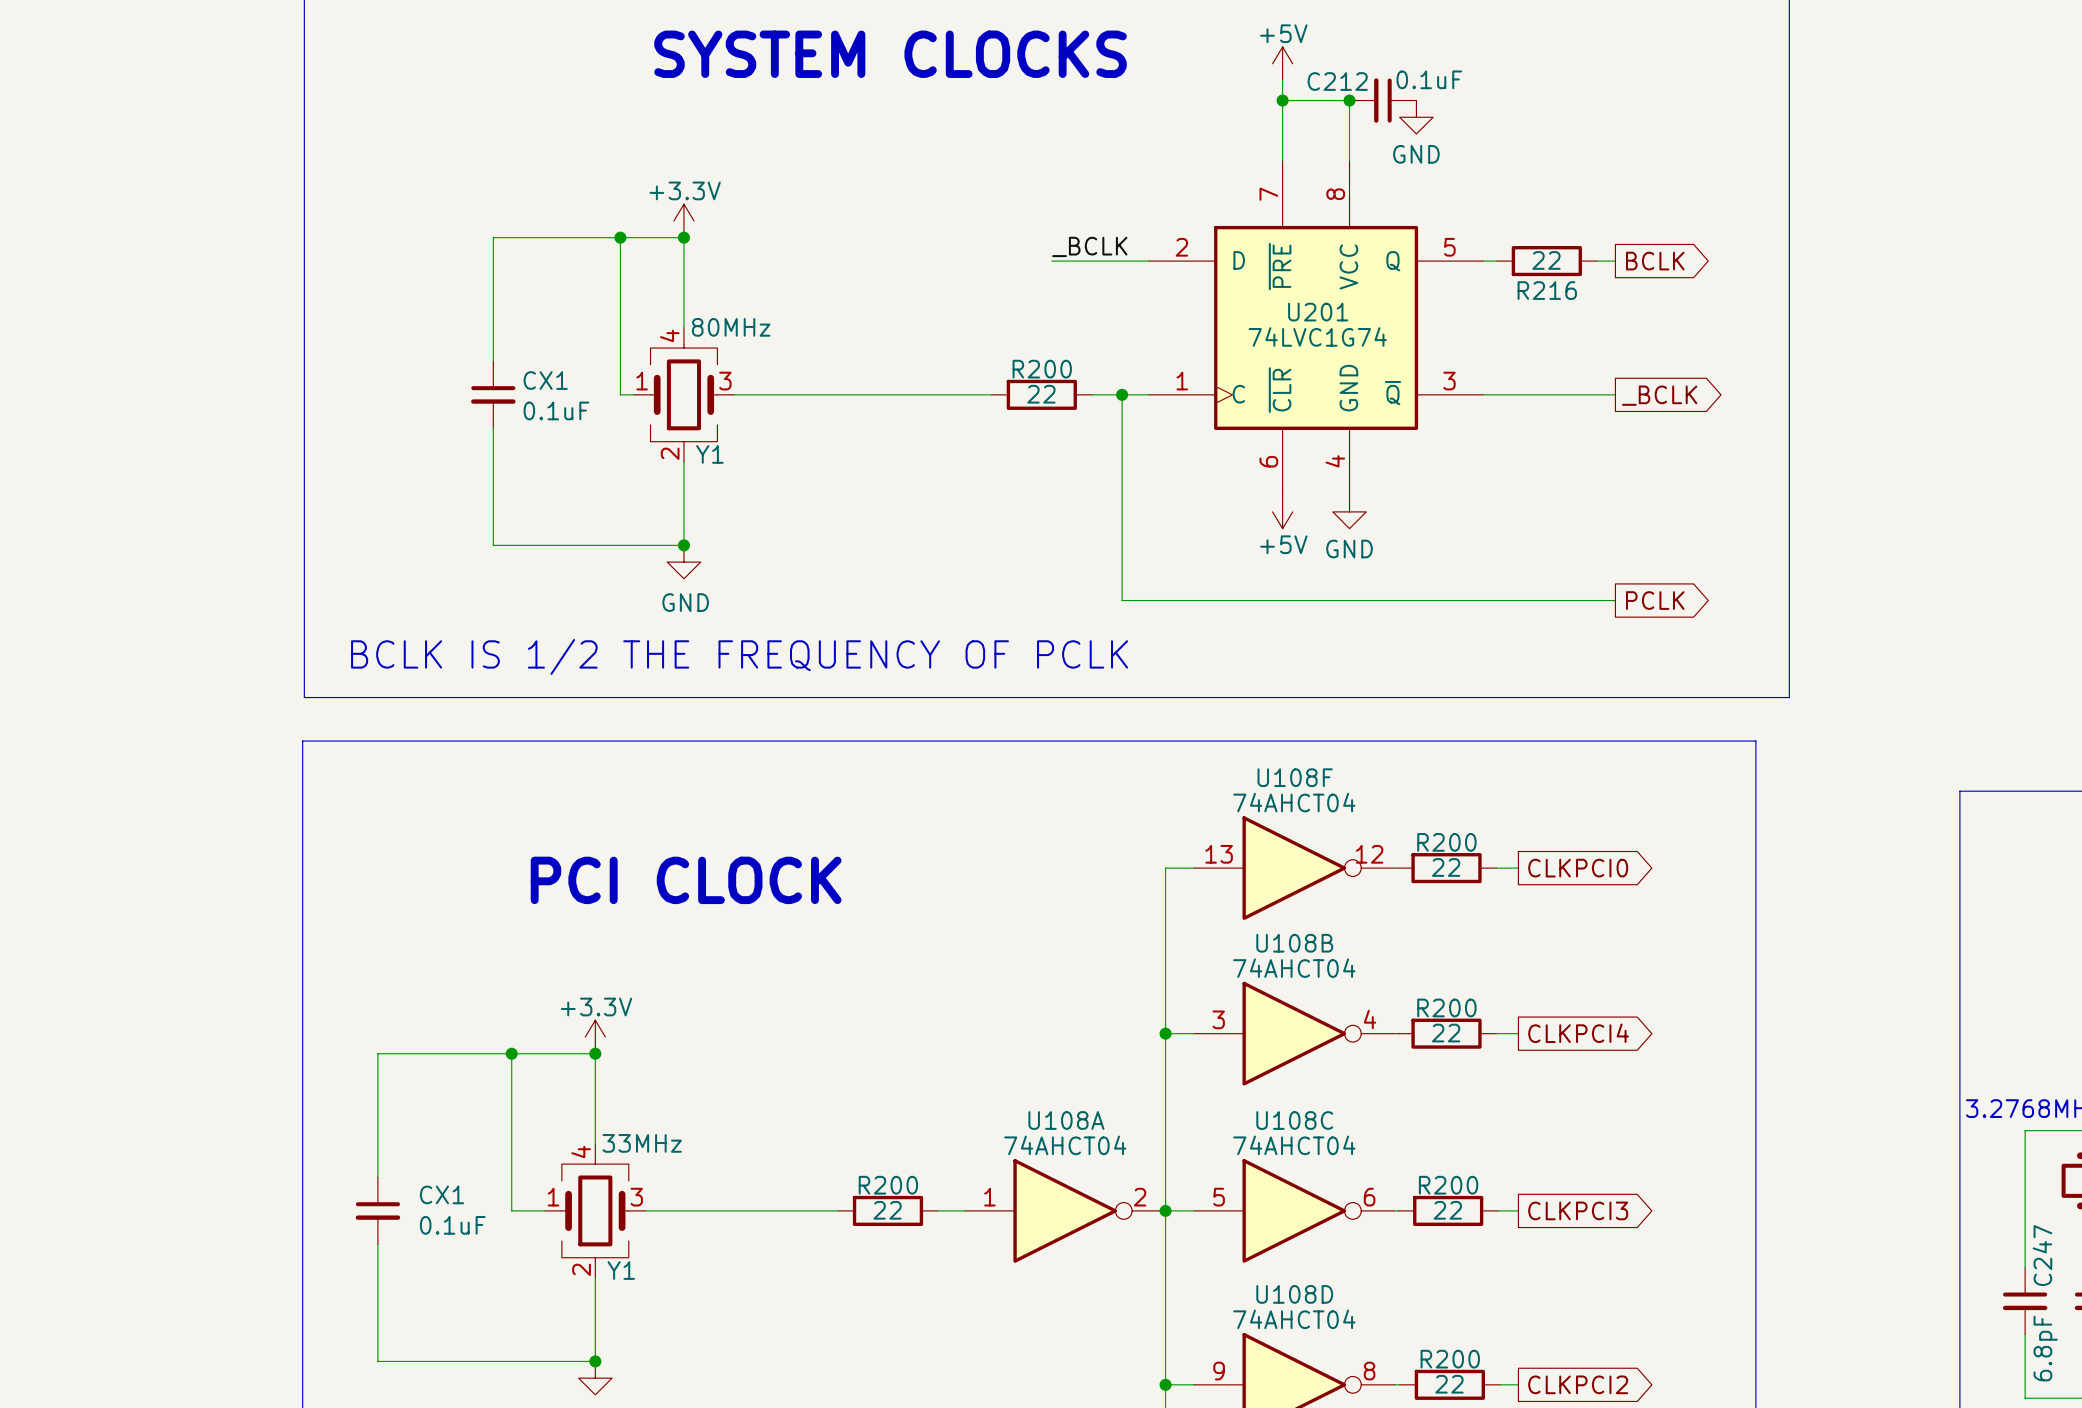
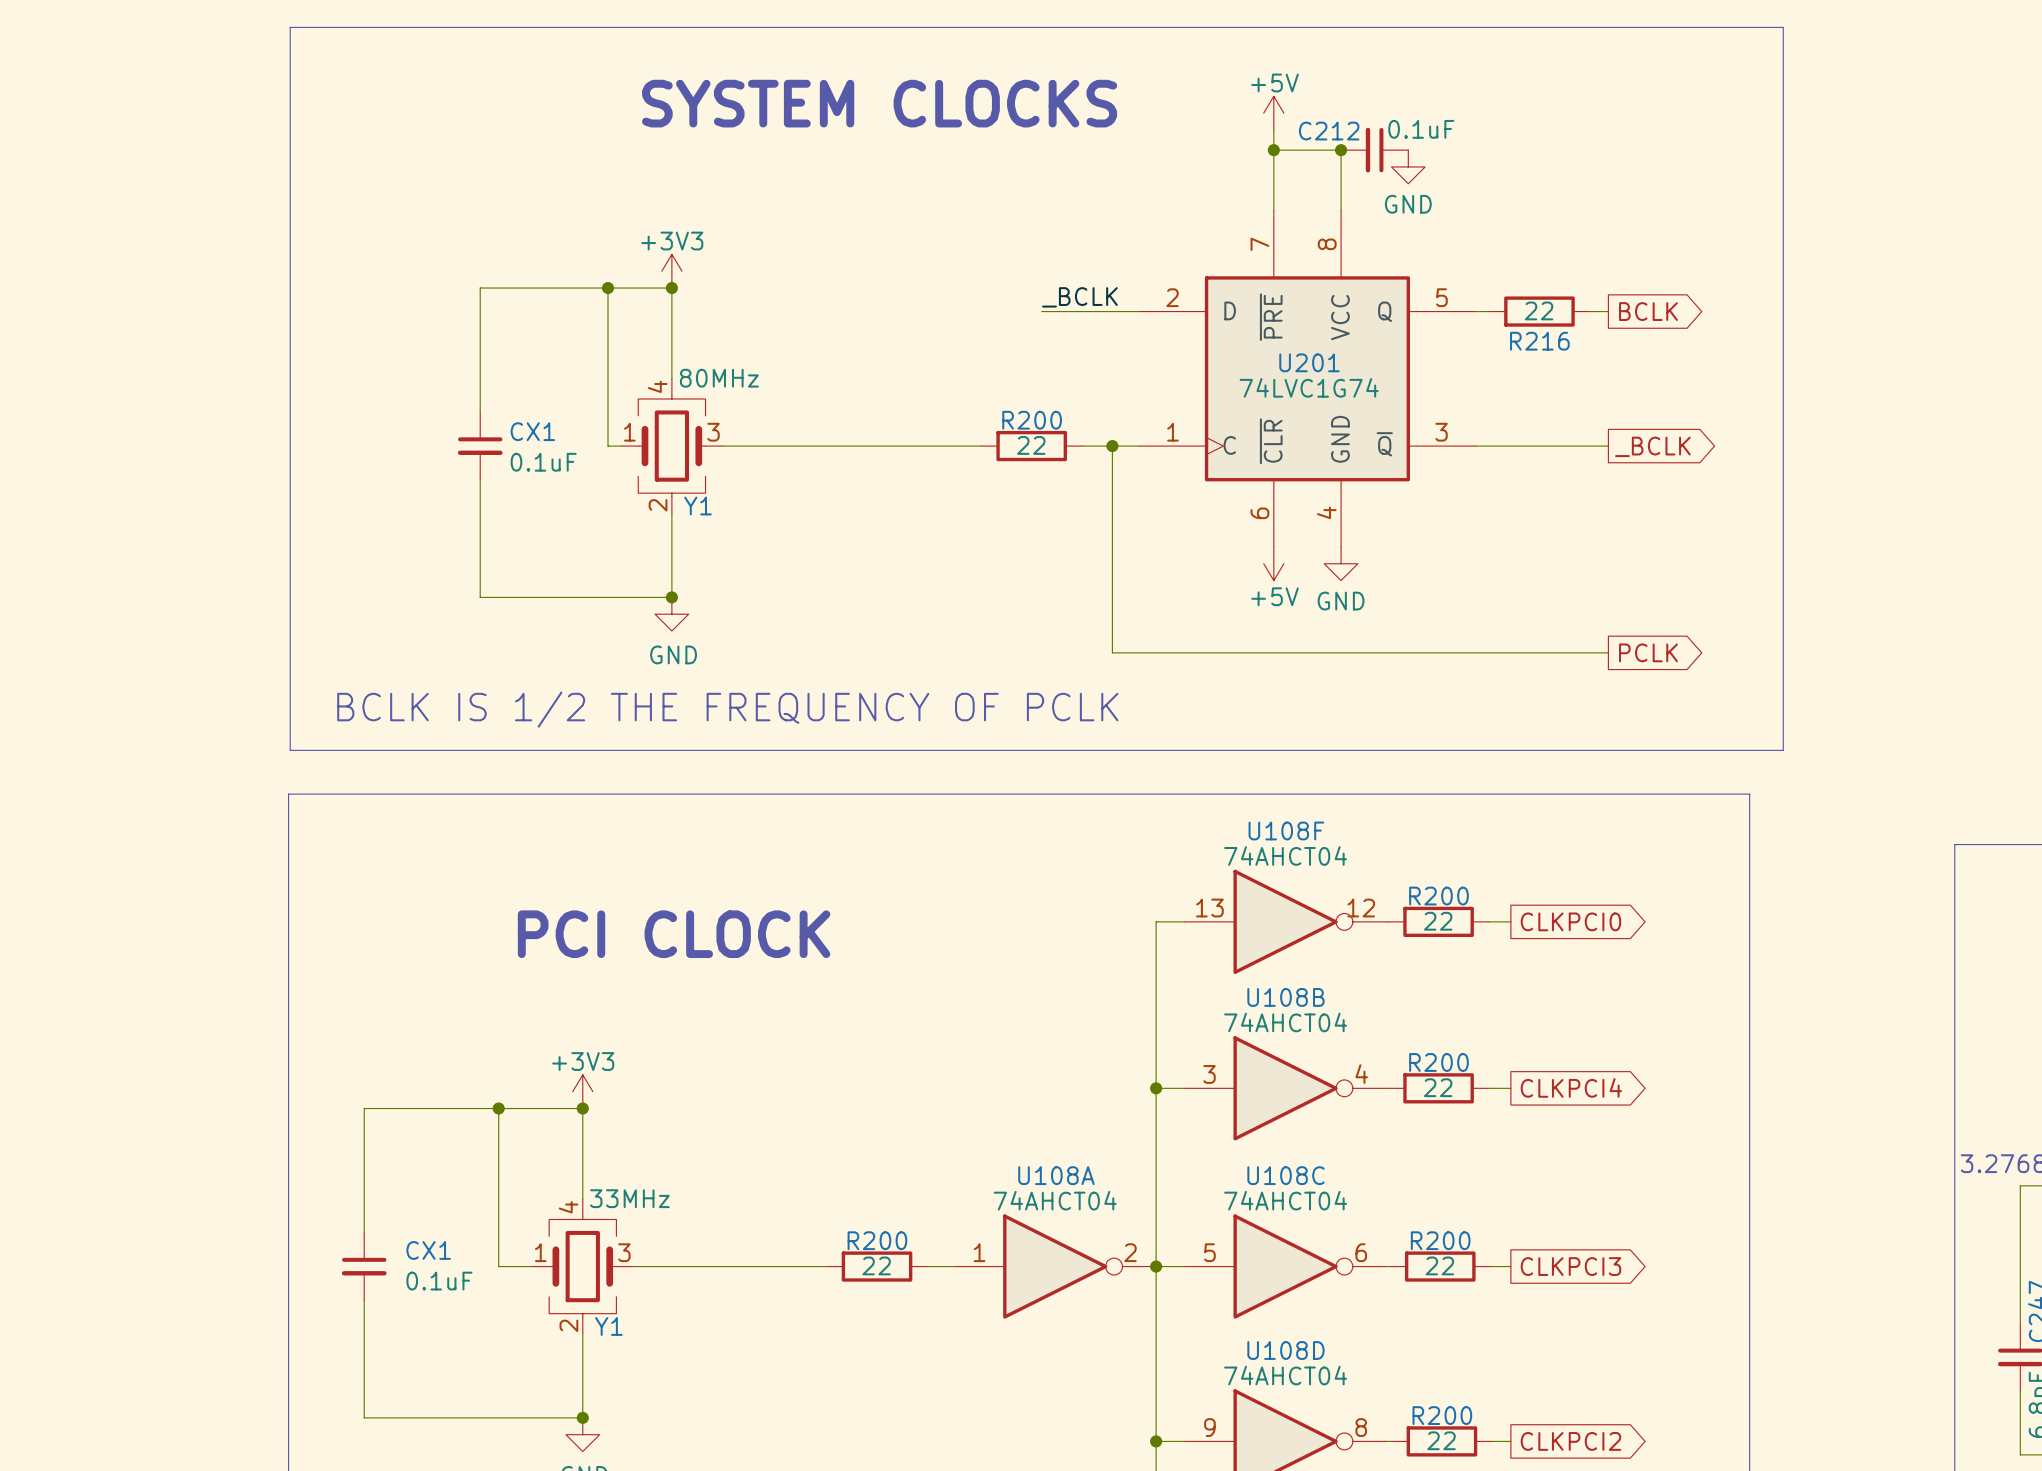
power symbol: +3.3V (683, 220) -> +3V3 (671, 271)
power symbol: +3.3V (595, 1037) -> +3V3 (582, 1091)

